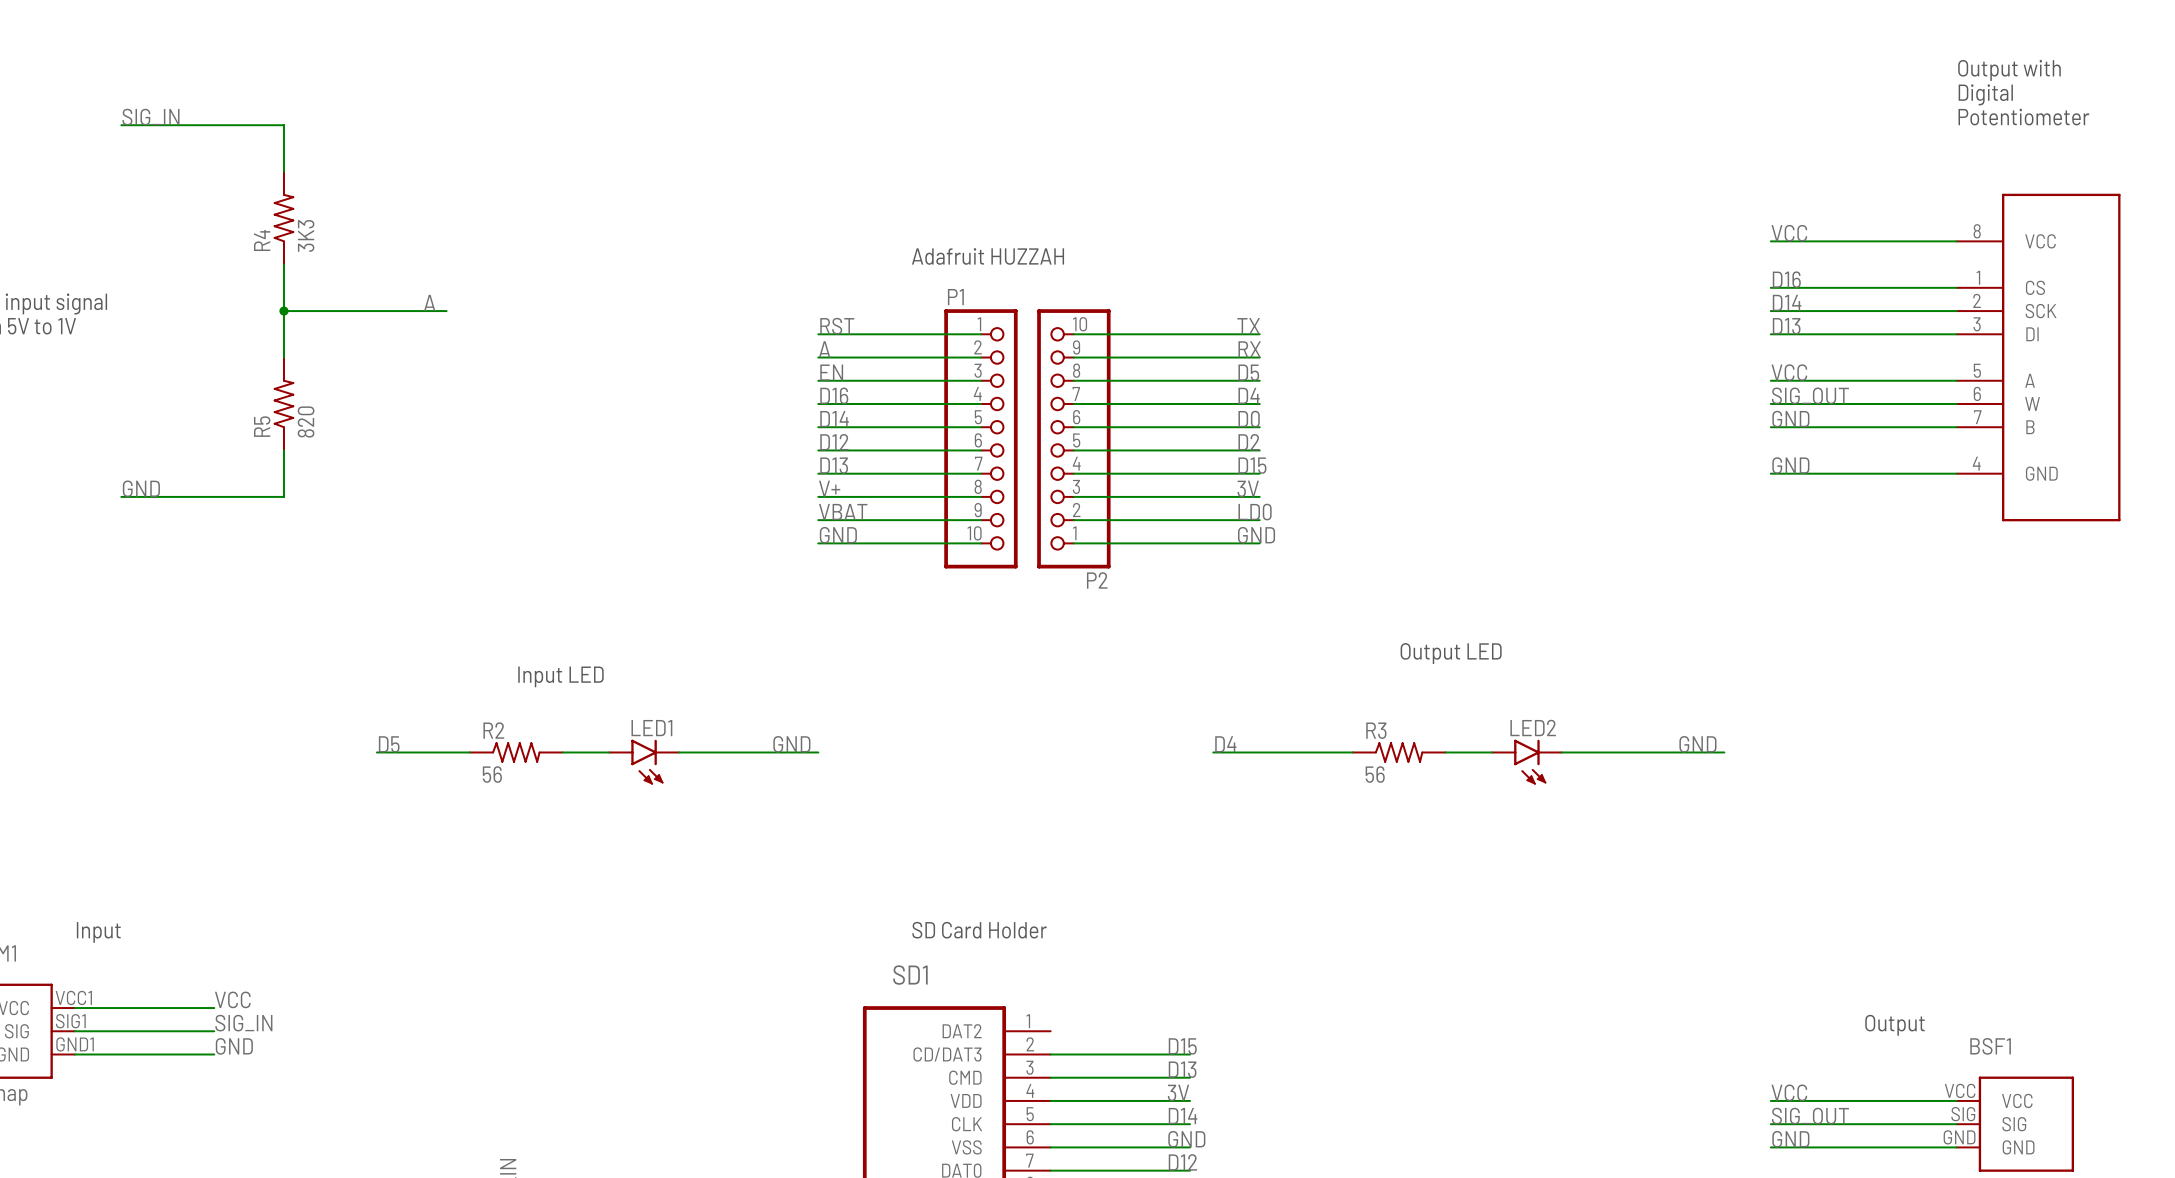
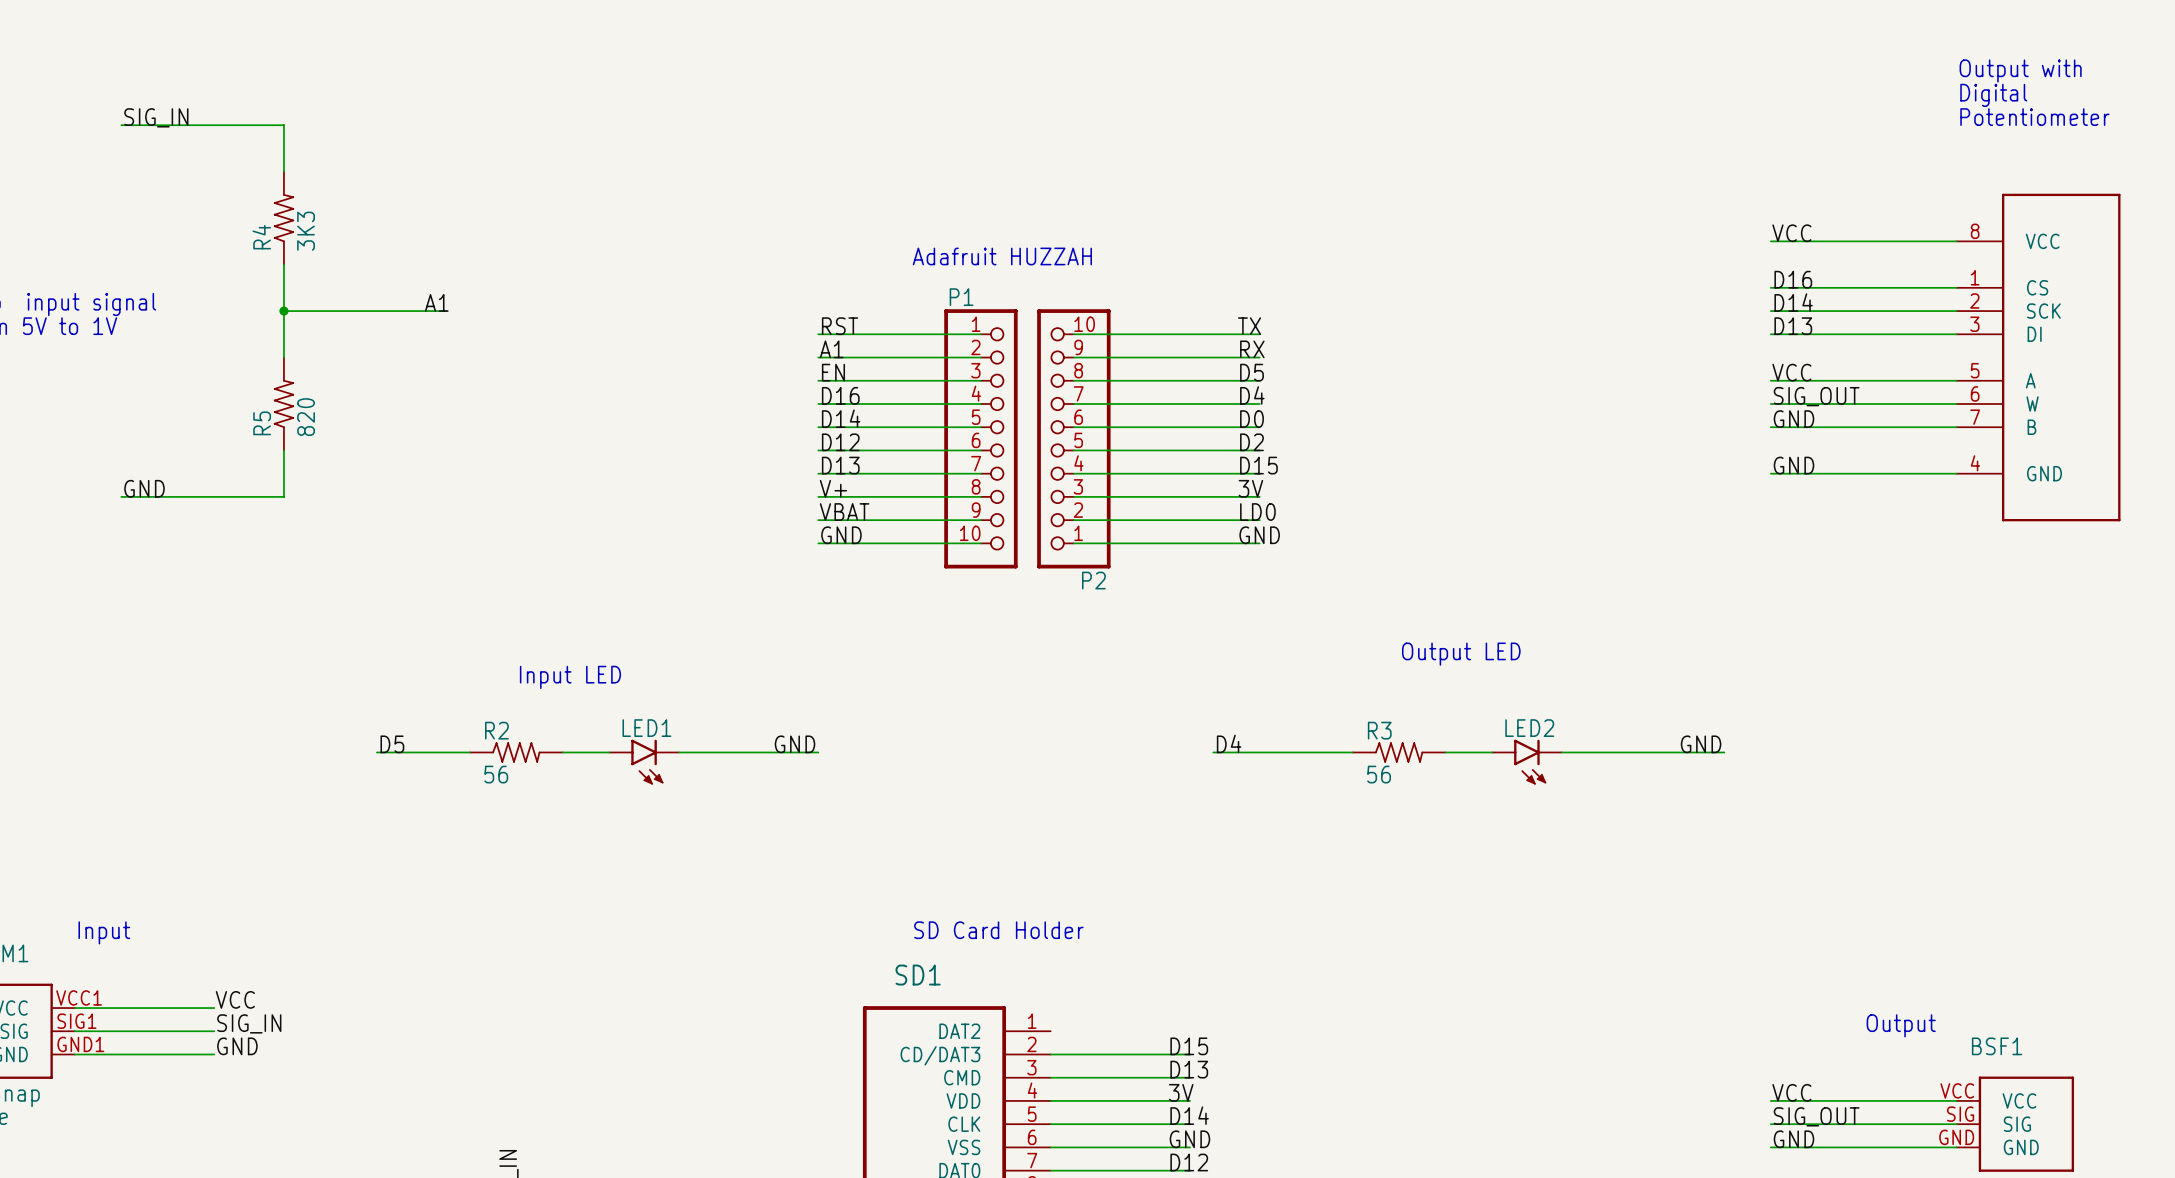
label: A (429, 302) -> A1 (436, 302)
label: A (824, 349) -> A1 (831, 349)

